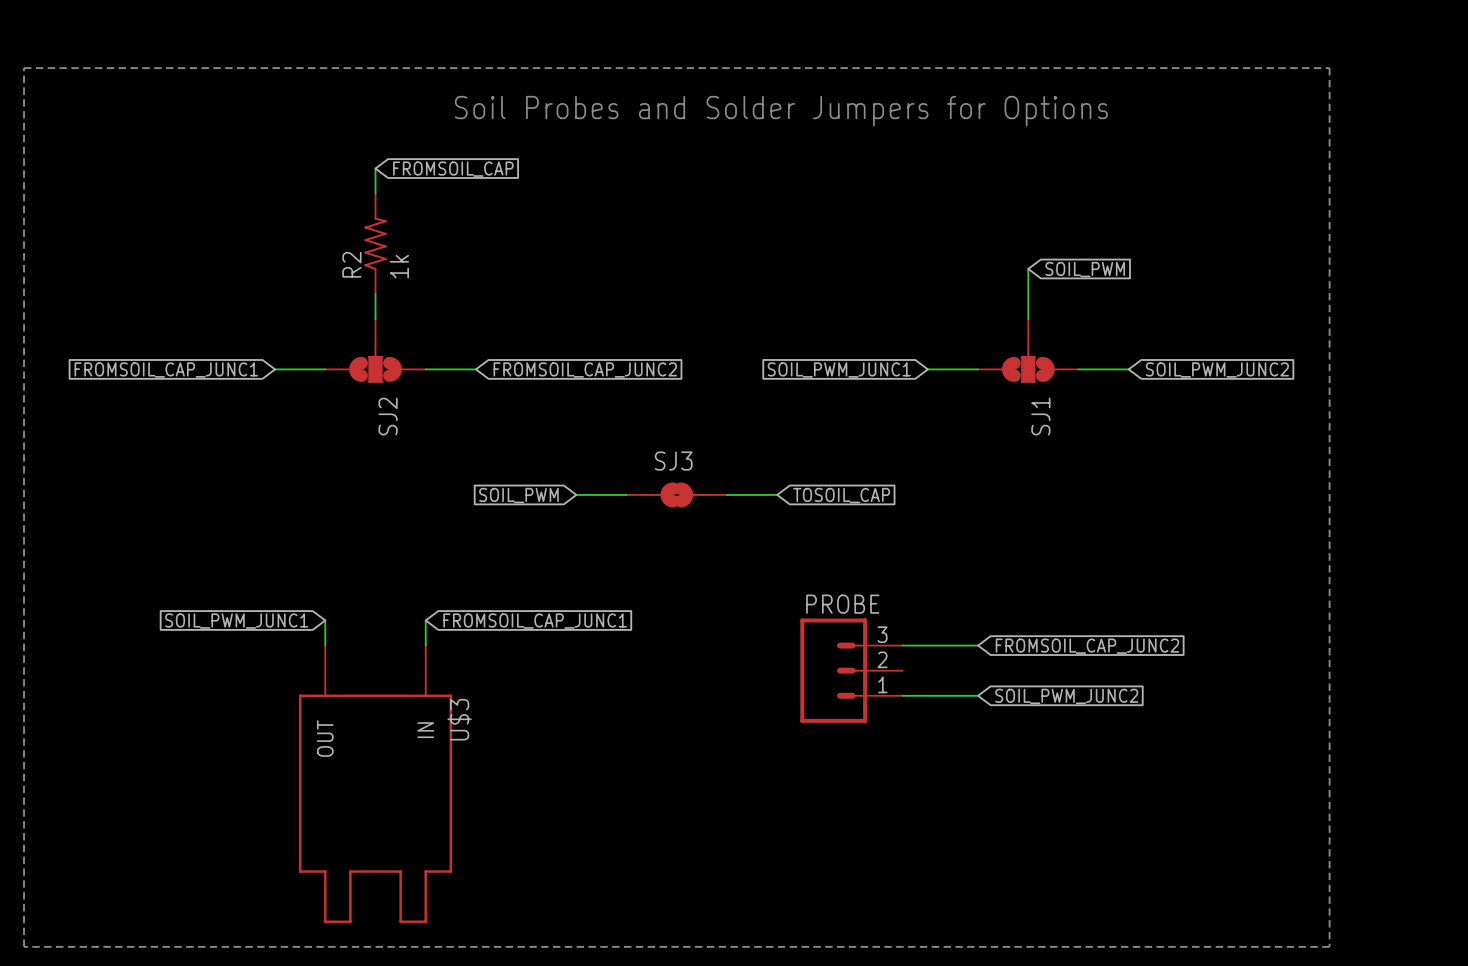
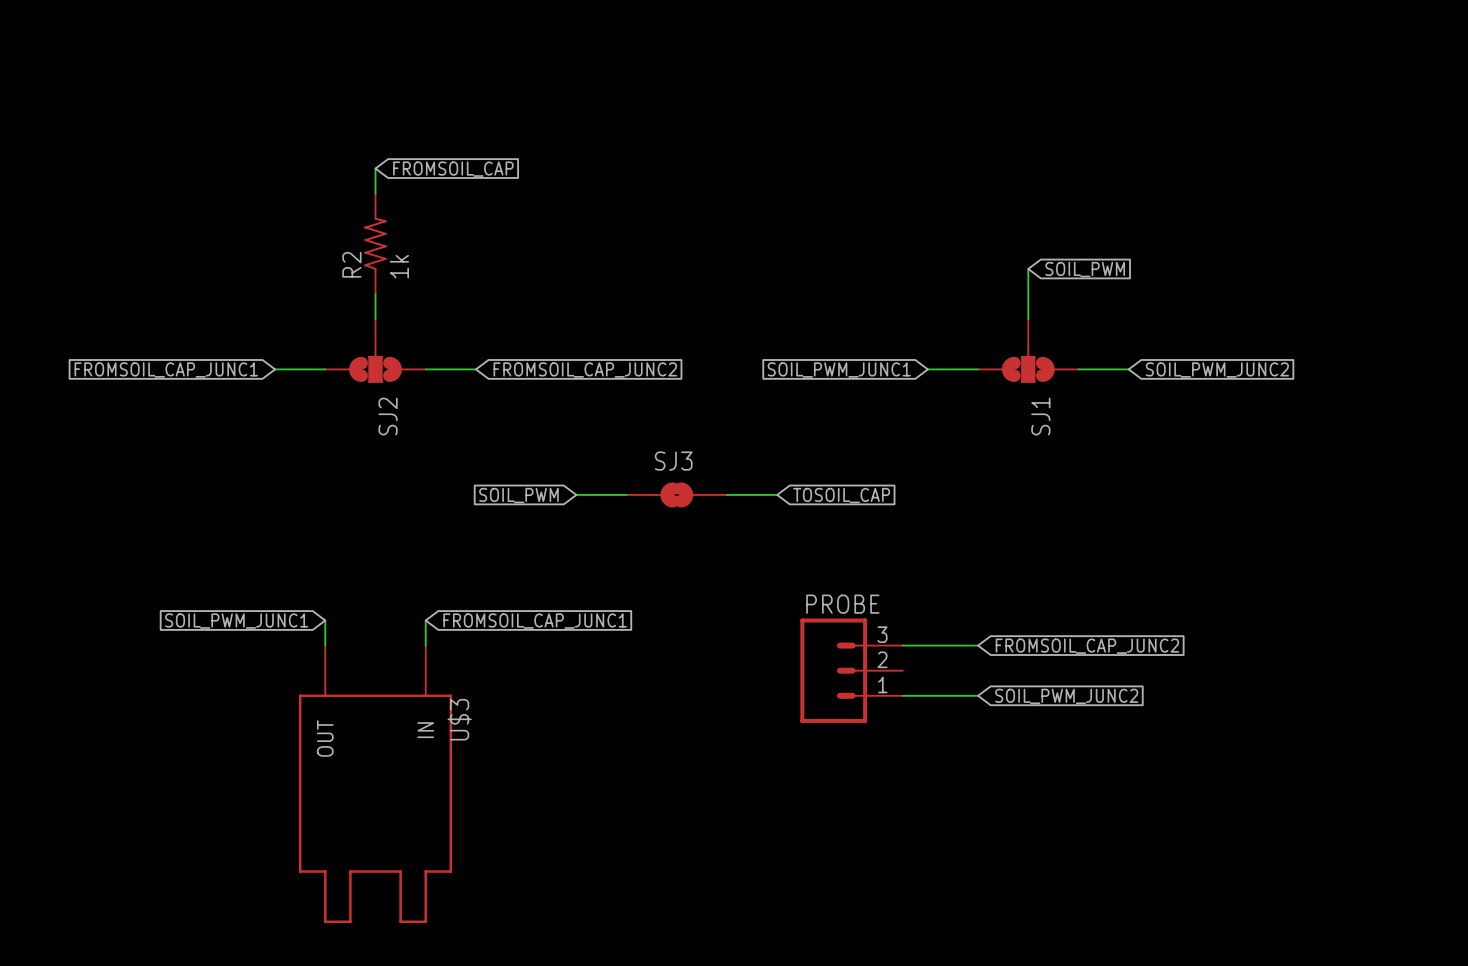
line: (24, 68) (24, 946) (1329, 946) (1329, 68) (24, 68) -> none
text: Soil Probes and Solder Jumpers for Options (781, 111) -> none

